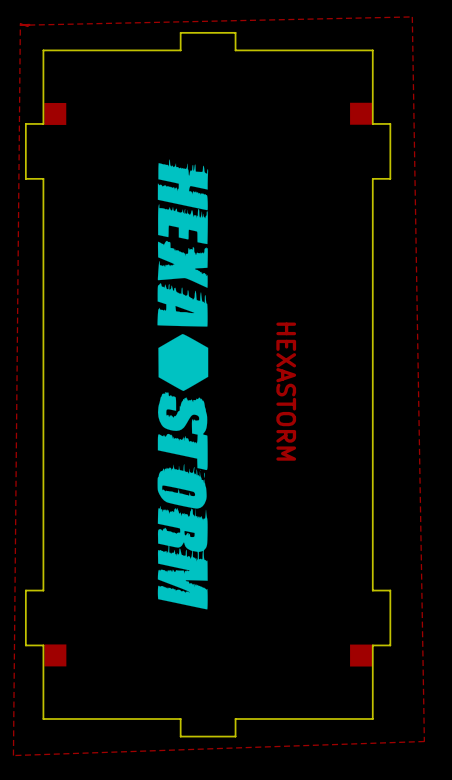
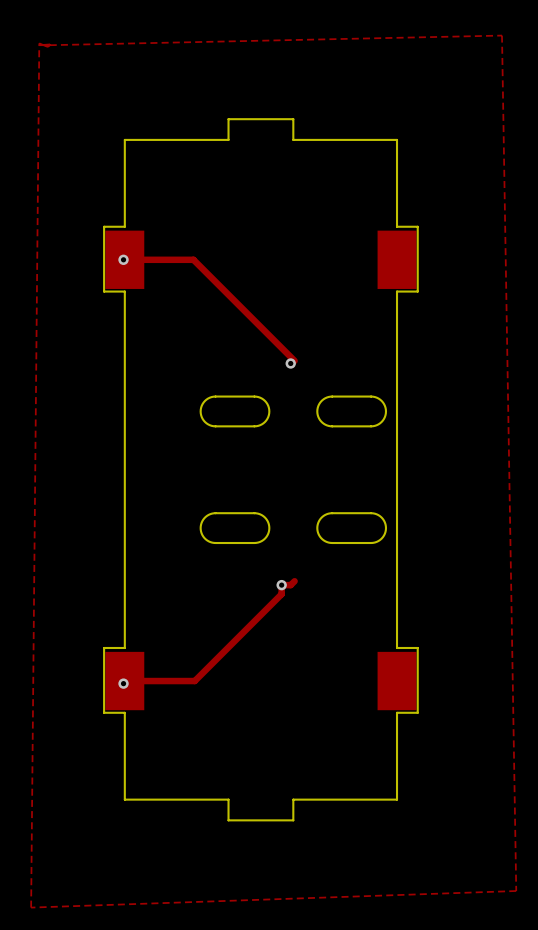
board edge: (180, 32) (180, 50) (43, 50) (43, 123) (25, 123) (25, 178) (43, 178) (43, 590) (25, 590) (25, 645) (43, 645) (43, 719) (180, 719) (180, 736) (235, 736) (235, 719) (372, 719) (372, 645) (390, 645) (390, 590) (372, 590) (372, 178) (390, 178) (390, 123) (372, 123) (372, 50) (235, 50) (235, 32) (180, 32) -> (228, 119) (228, 139) (124, 139) (124, 226) (104, 226) (104, 291) (124, 291) (124, 647) (104, 647) (104, 712) (124, 712) (124, 799) (228, 799) (228, 820) (293, 820) (293, 799) (397, 799) (397, 712) (417, 712) (417, 647) (397, 647) (397, 291) (417, 291) (417, 226) (397, 226) (397, 139) (293, 139) (293, 119) (228, 119)
part: (55, 113) -> none
part: (361, 113) -> none
drawing: [157, 159, 209, 610] -> none
via: none -> (123, 259)
track: none -> (124, 259) (193, 259) (294, 360)
part: none -> (124, 259)
part: none -> (397, 259)
via: none -> (290, 363)
board edge: none -> (215, 396) (260, 397) (268, 405) (268, 417) (263, 423) (256, 426) (209, 425) (202, 418) (200, 409) (205, 400) (215, 396)
board edge: none -> (332, 396) (376, 397) (384, 405) (384, 417) (380, 423) (373, 426) (326, 425) (319, 419) (317, 409) (322, 400) (332, 396)
text: HEXASTORM (286, 391) -> none
board edge: none -> (215, 513) (260, 514) (268, 522) (268, 533) (263, 539) (256, 542) (210, 542) (202, 535) (201, 524) (207, 515) (215, 513)
board edge: none -> (332, 513) (376, 514) (384, 522) (384, 533) (380, 539) (373, 542) (326, 542) (319, 535) (317, 524) (323, 515) (332, 513)
track: none -> (294, 581) (290, 585) (281, 585) (281, 594) (194, 681) (124, 681)
via: none -> (281, 585)
part: none -> (124, 681)
part: none -> (397, 681)
via: none -> (123, 683)
part: (55, 655) -> none
part: (361, 655) -> none

